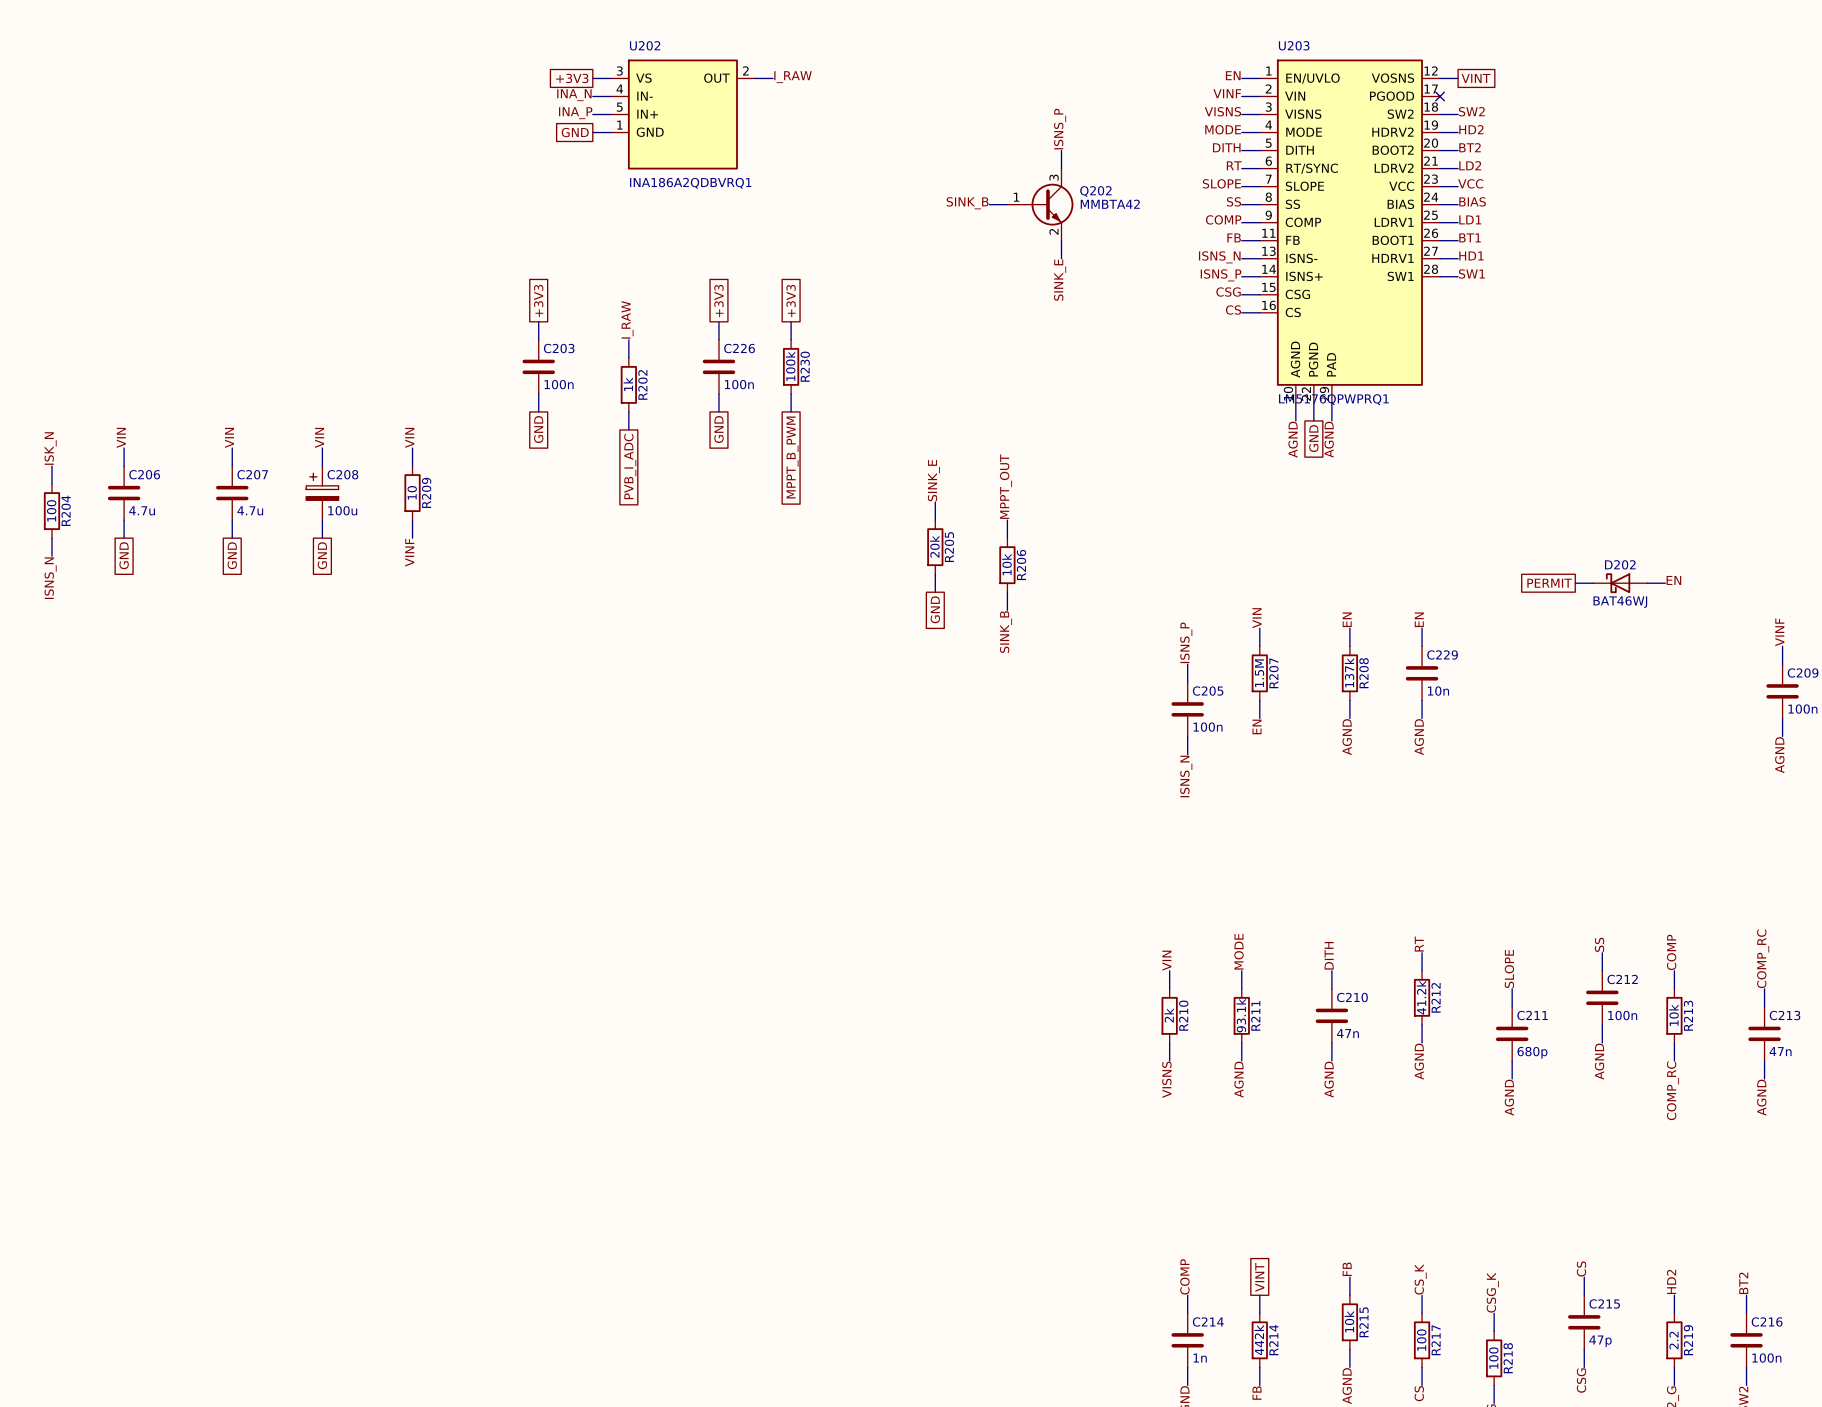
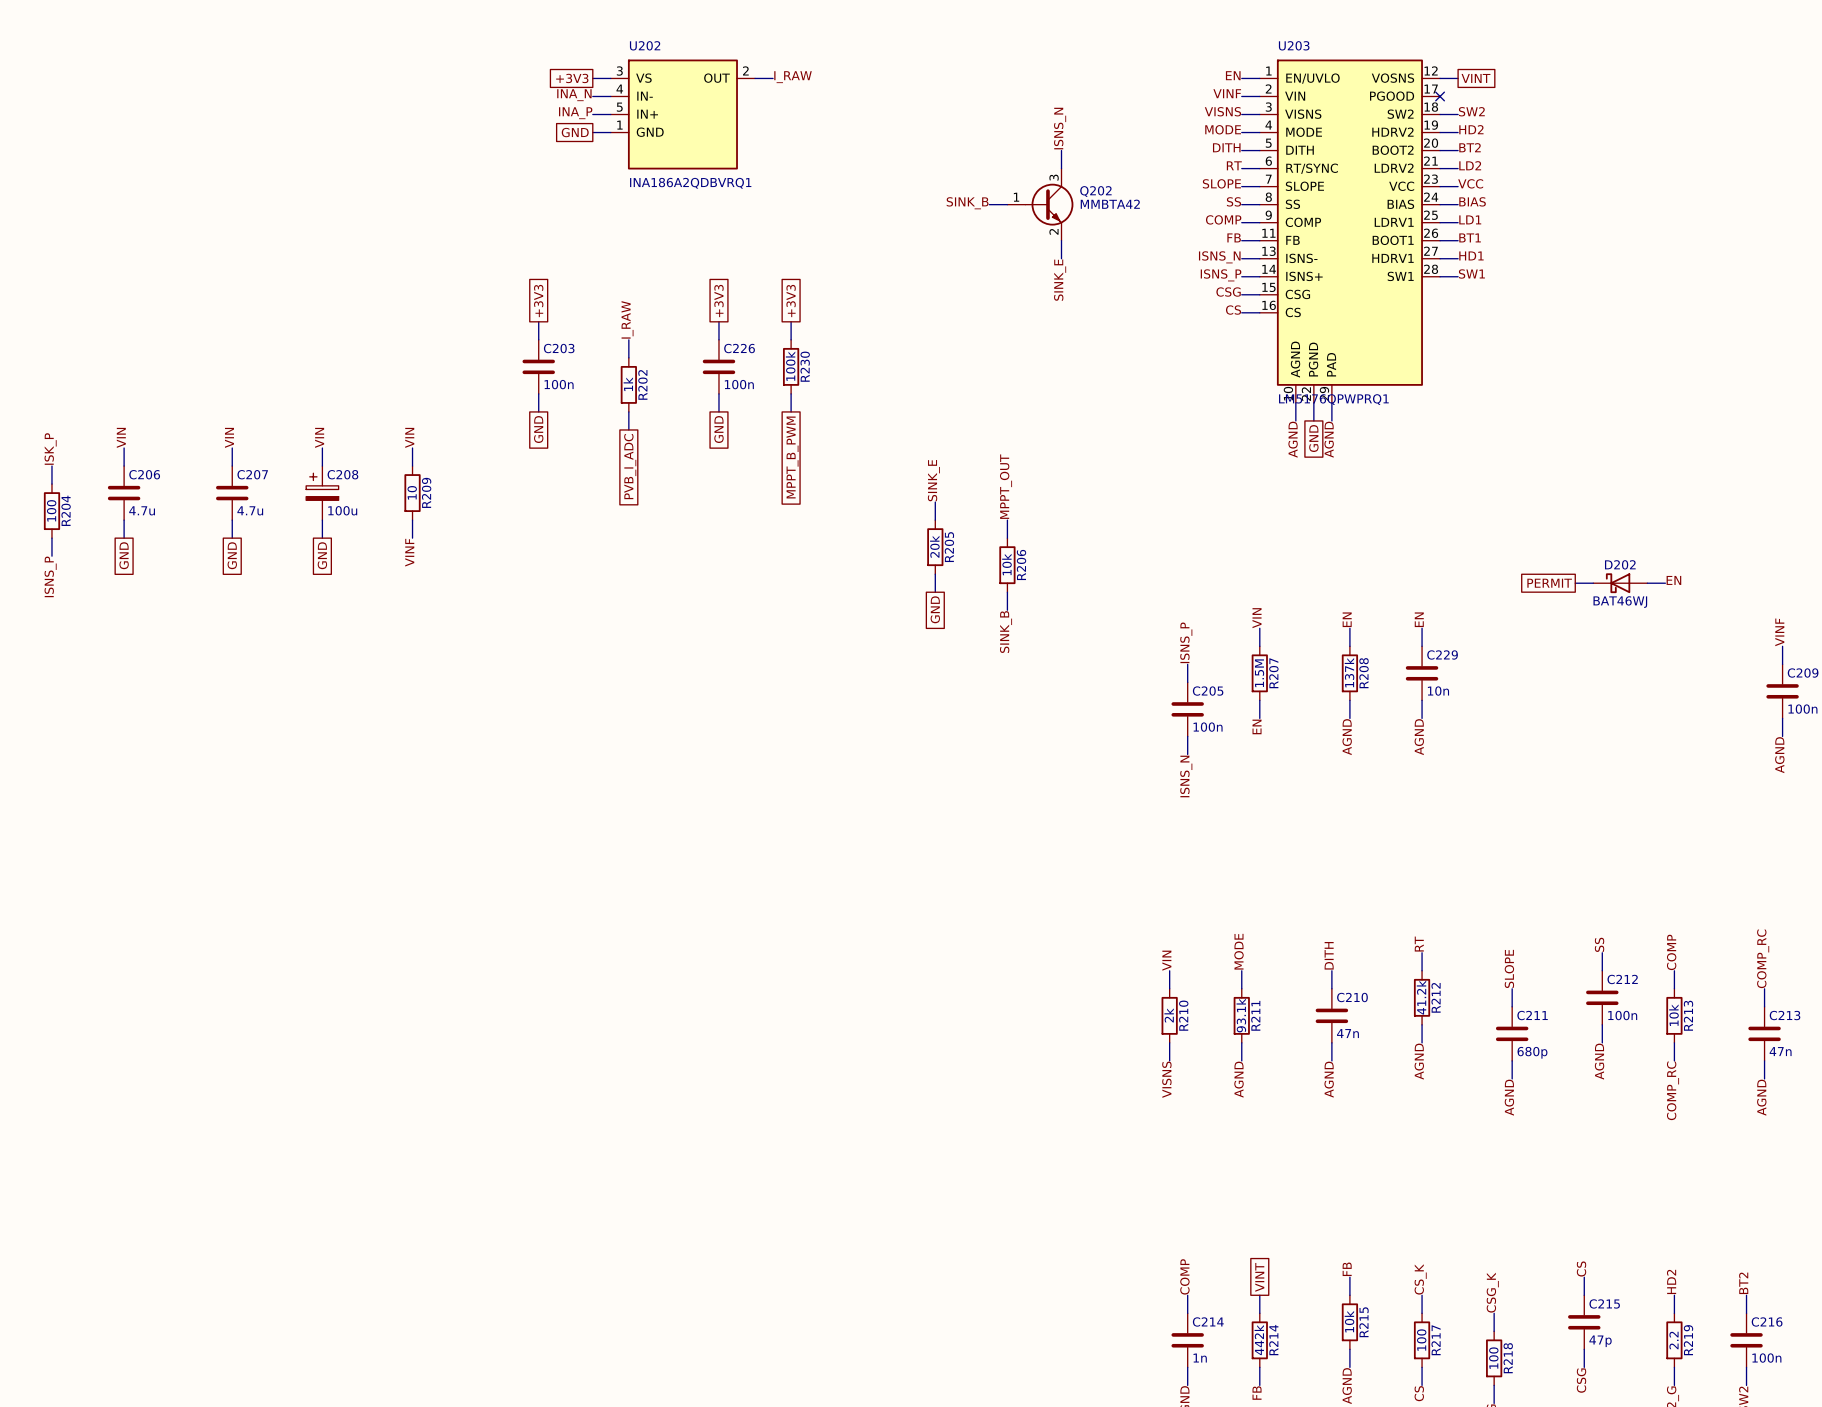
label: ISNS_P (1060, 129) -> ISNS_N (1060, 128)
label: ISK_N (50, 448) -> ISK_P (50, 449)
label: ISNS_N (50, 578) -> ISNS_P (50, 576)

